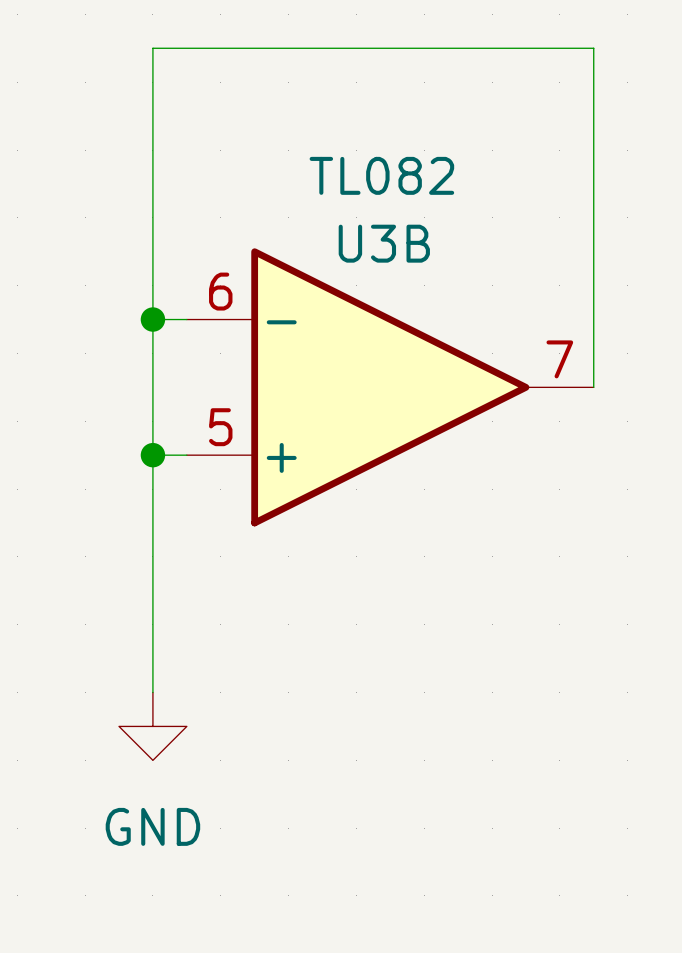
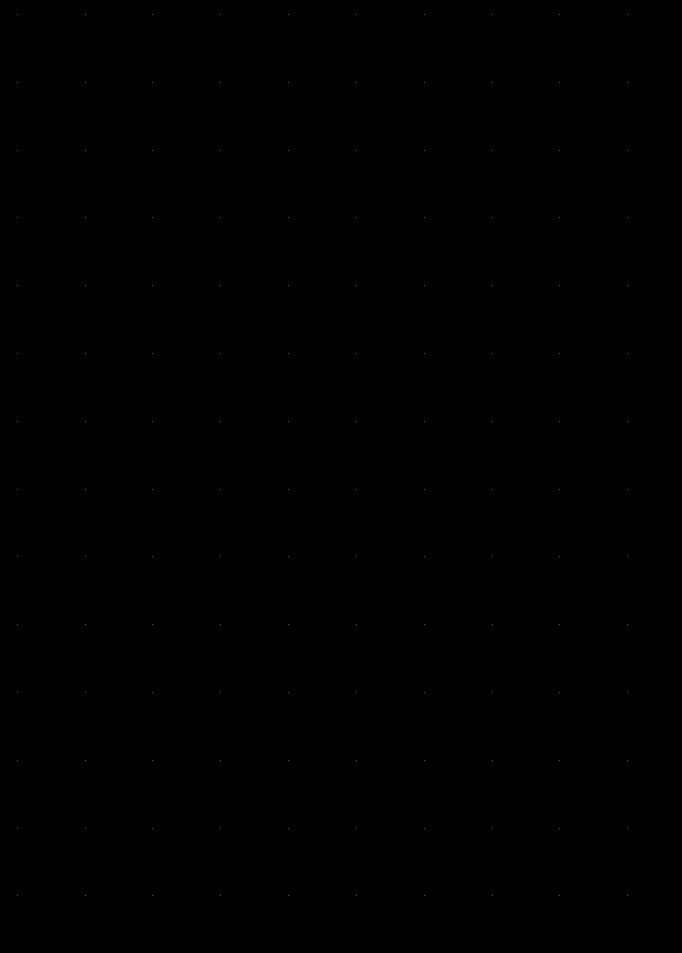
wire: (152, 319) (186, 319) -> none
junction: (152, 319) -> none
U3B: TL082 (390, 387) -> none
wire: (593, 387) (593, 48) (152, 48) (152, 692) -> none
wire: (152, 455) (186, 455) -> none
junction: (152, 455) -> none
power symbol: GND (152, 726) -> none

